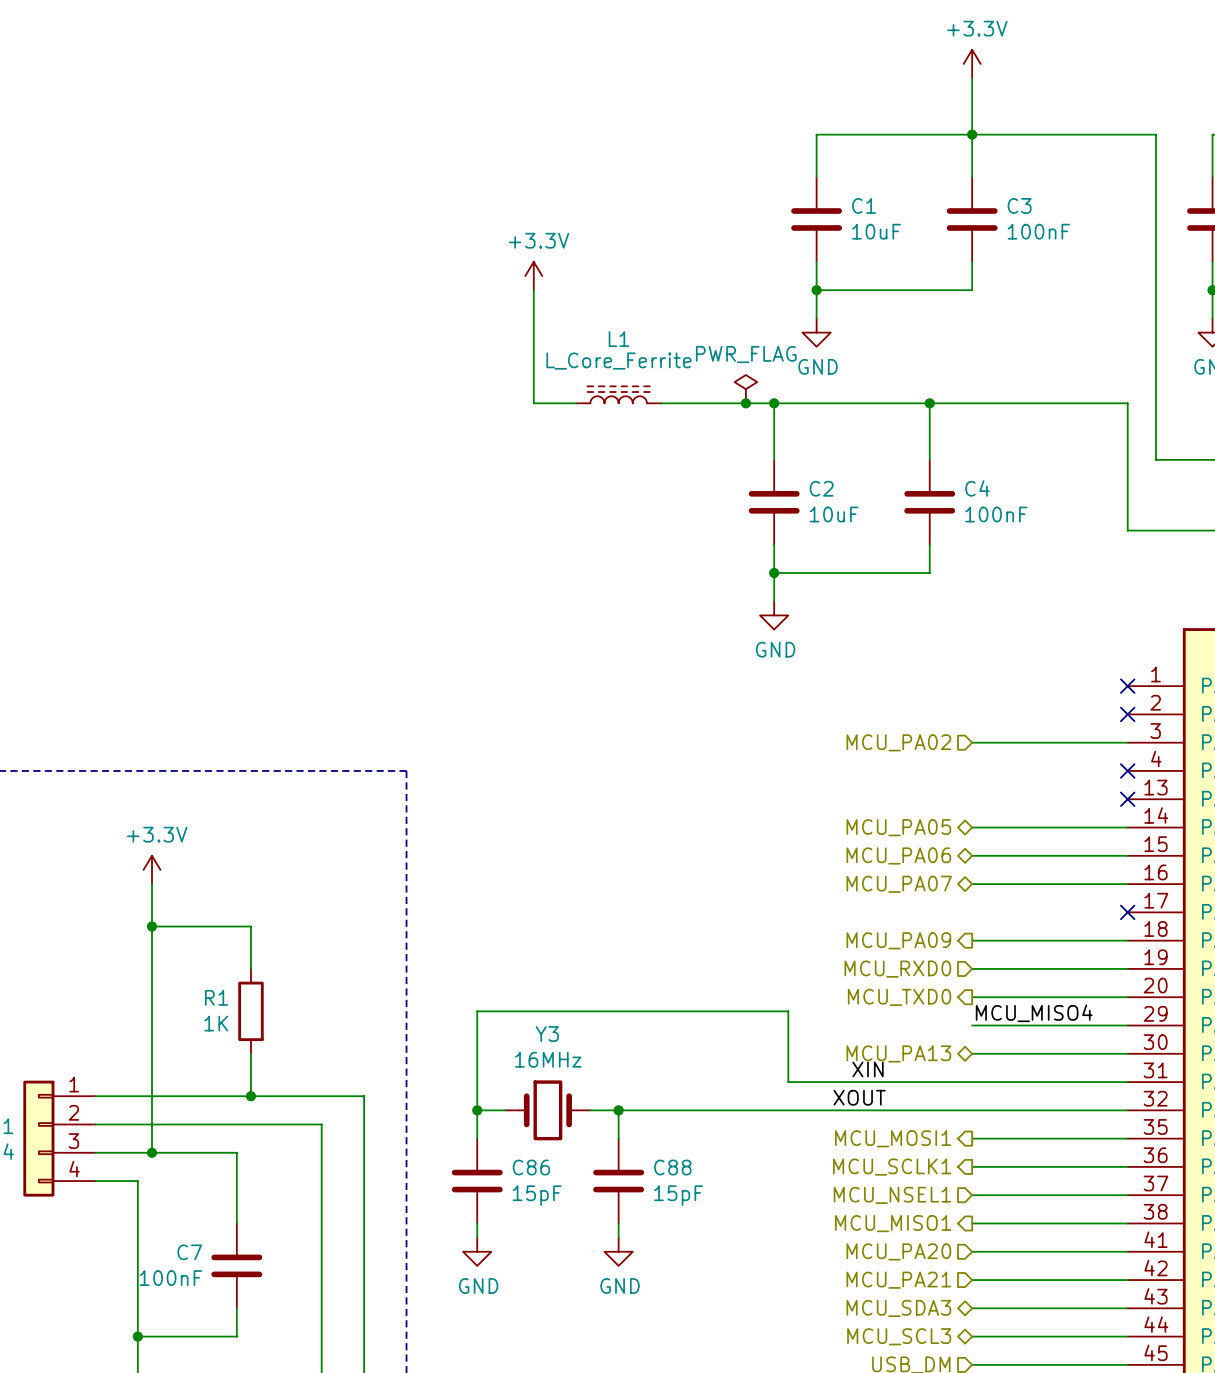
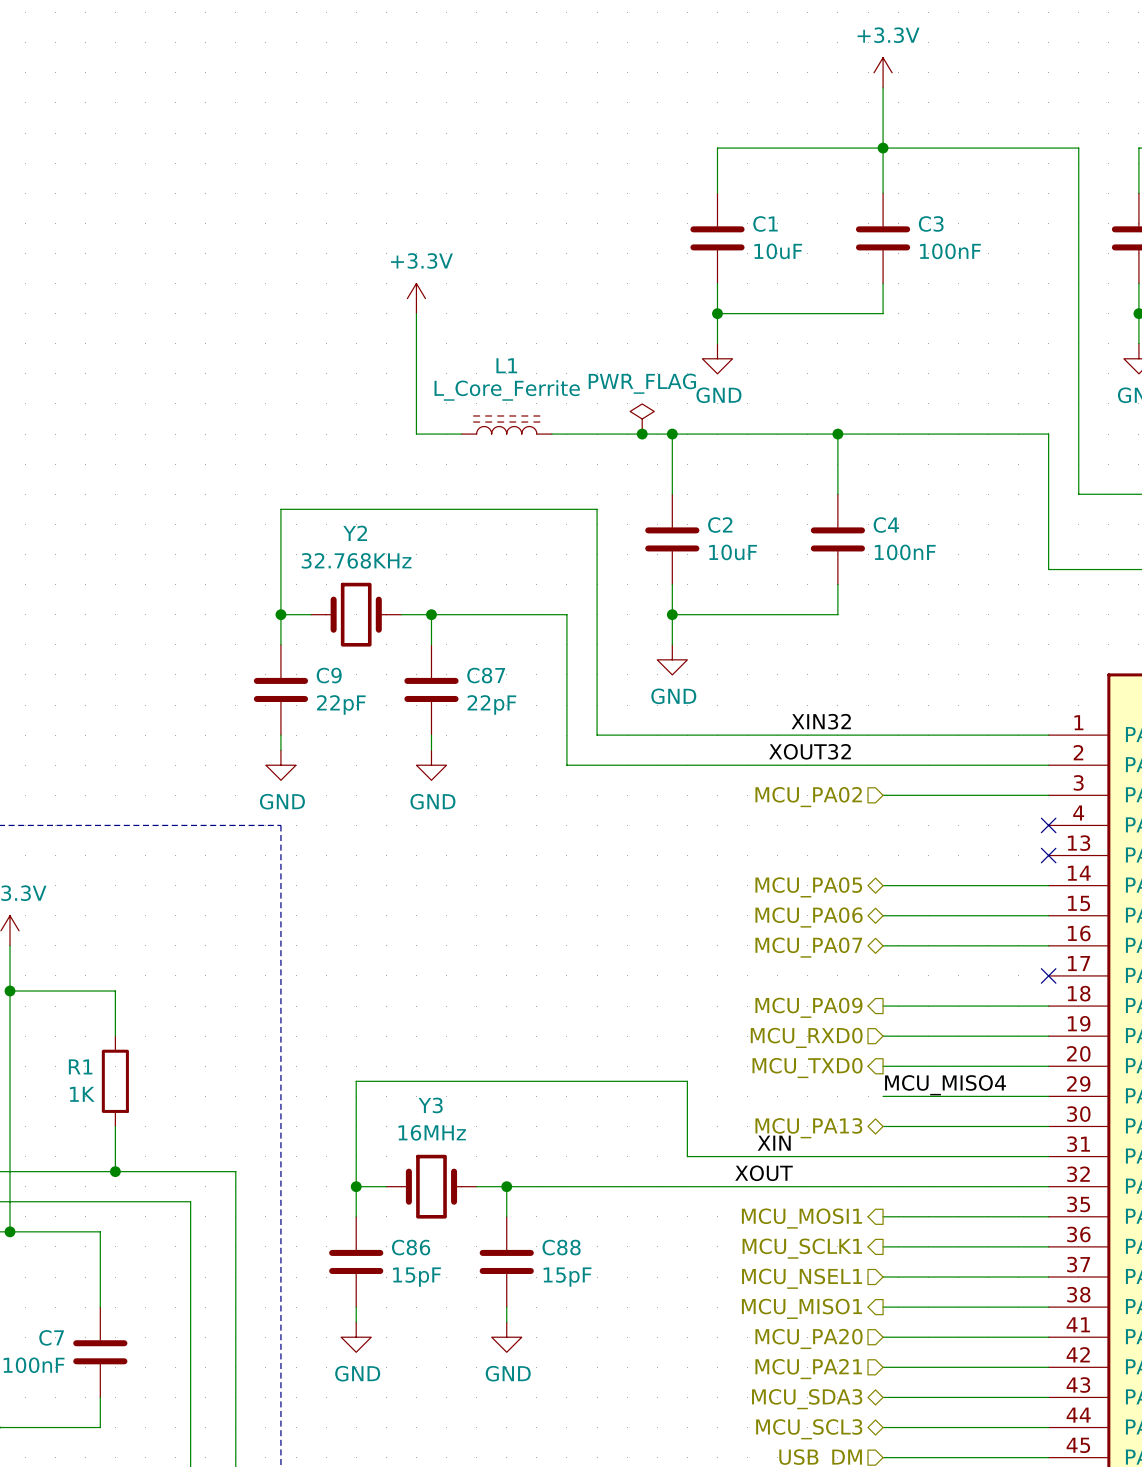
wire: none -> (280, 614) (311, 614)
junction: none -> (280, 614)
Y2: none -> 32.768KHz (356, 614)
wire: none -> (401, 614) (566, 614) (566, 765) (1048, 765)
wire: none -> (431, 614) (431, 644)
junction: none -> (431, 614)
wire: none -> (280, 644) (280, 509) (597, 509) (597, 735) (1048, 735)
C9: none -> 22pF (280, 689)
C87: none -> 22pF (431, 689)
label: none -> XIN32 (821, 721)
wire: none -> (280, 735) (280, 750)
wire: none -> (431, 735) (431, 750)
no-connect mark: (1127, 686) -> none
label: none -> XOUT32 (810, 751)
power symbol: none -> GND (280, 765)
power symbol: none -> GND (431, 765)
no-connect mark: (1127, 714) -> none

